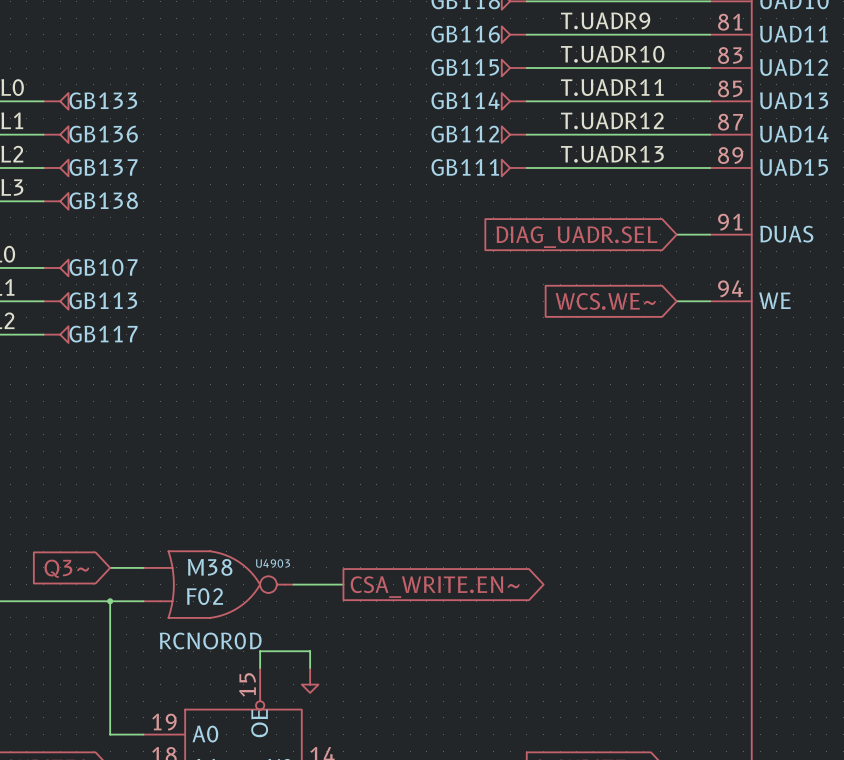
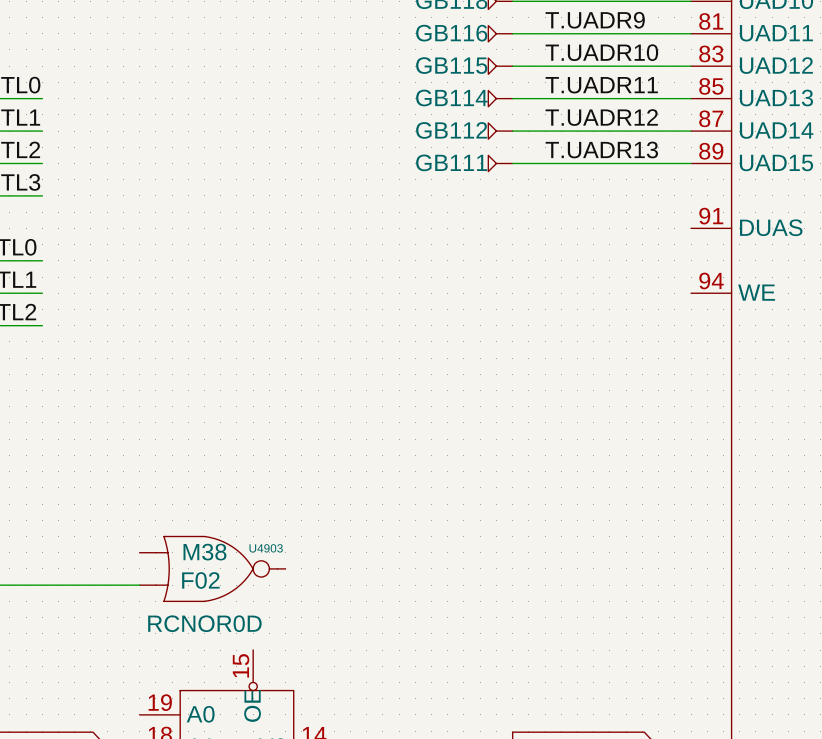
GB133: (56, 101) -> none
GB136: (56, 134) -> none
GB137: (56, 167) -> none
GB138: (56, 201) -> none
wire: (676, 234) (710, 234) -> none
global label: DIAG_UADR.SEL (576, 237) -> none
GB107: (56, 267) -> none
GB113: (56, 301) -> none
global label: WCS.WE~ (605, 301) -> none
wire: (676, 301) (710, 301) -> none
GB117: (56, 334) -> none
wire: (110, 567) (143, 567) -> none
global label: Q3~ (66, 568) -> none
wire: (293, 584) (343, 584) -> none
global label: CSA_WRITE.EN~ (435, 587) -> none
wire: (110, 601) (110, 734) (143, 734) -> none
junction: (110, 601) -> none
wire: (260, 667) (260, 651) (310, 651) (310, 667) -> none
power symbol: (310, 680) -> none

